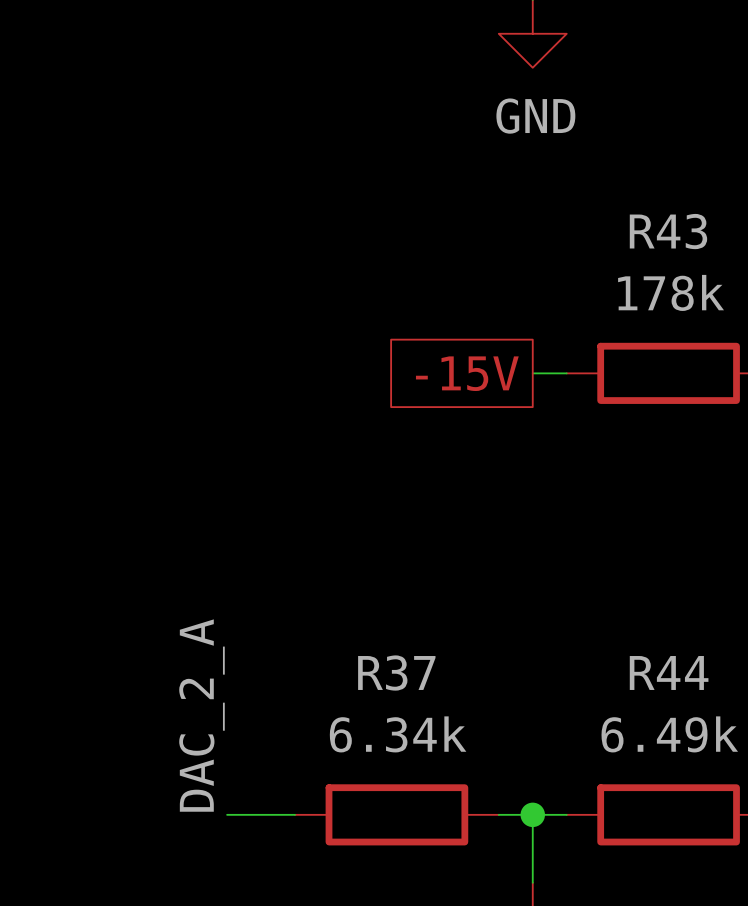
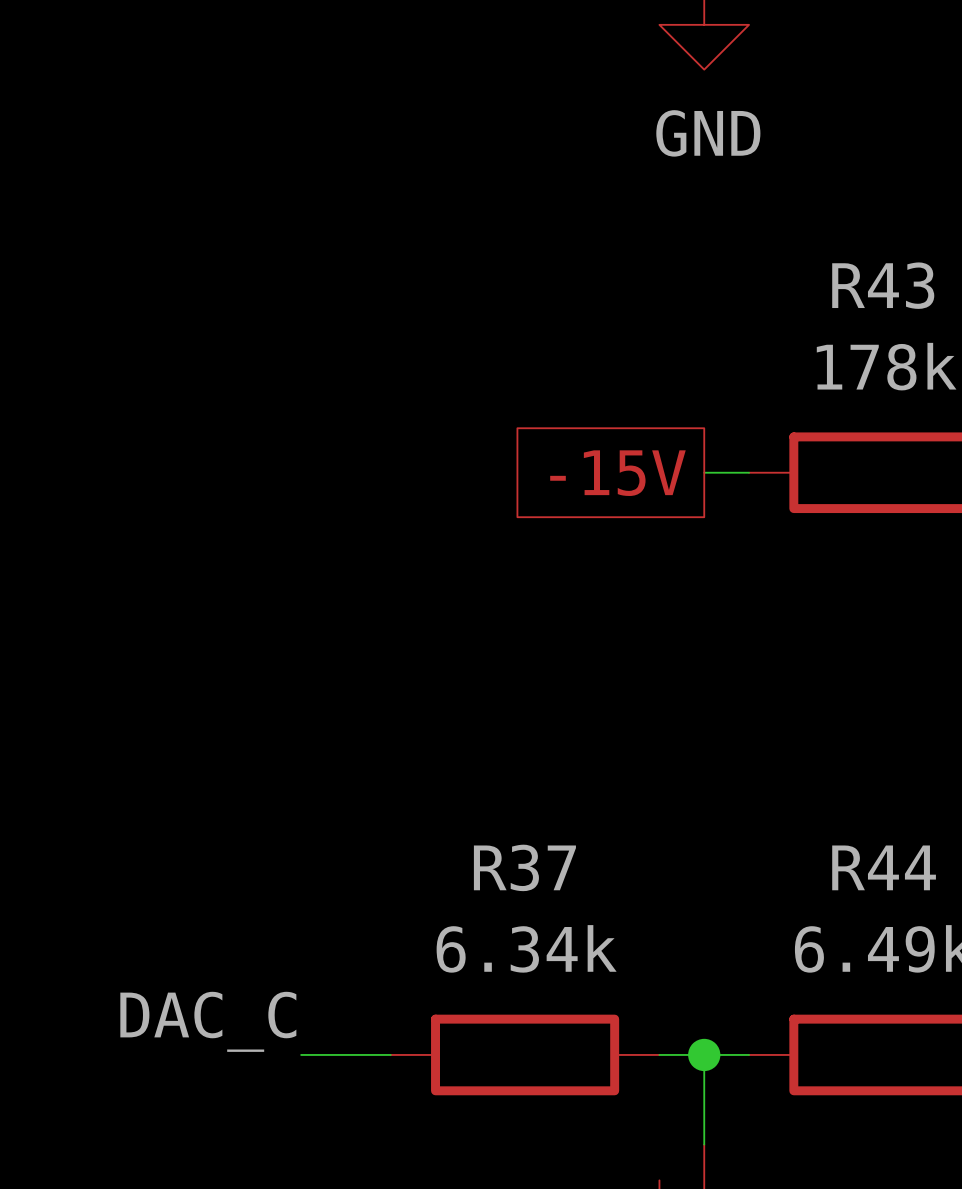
label: DAC_2_A (202, 715) -> DAC_C (208, 1021)

